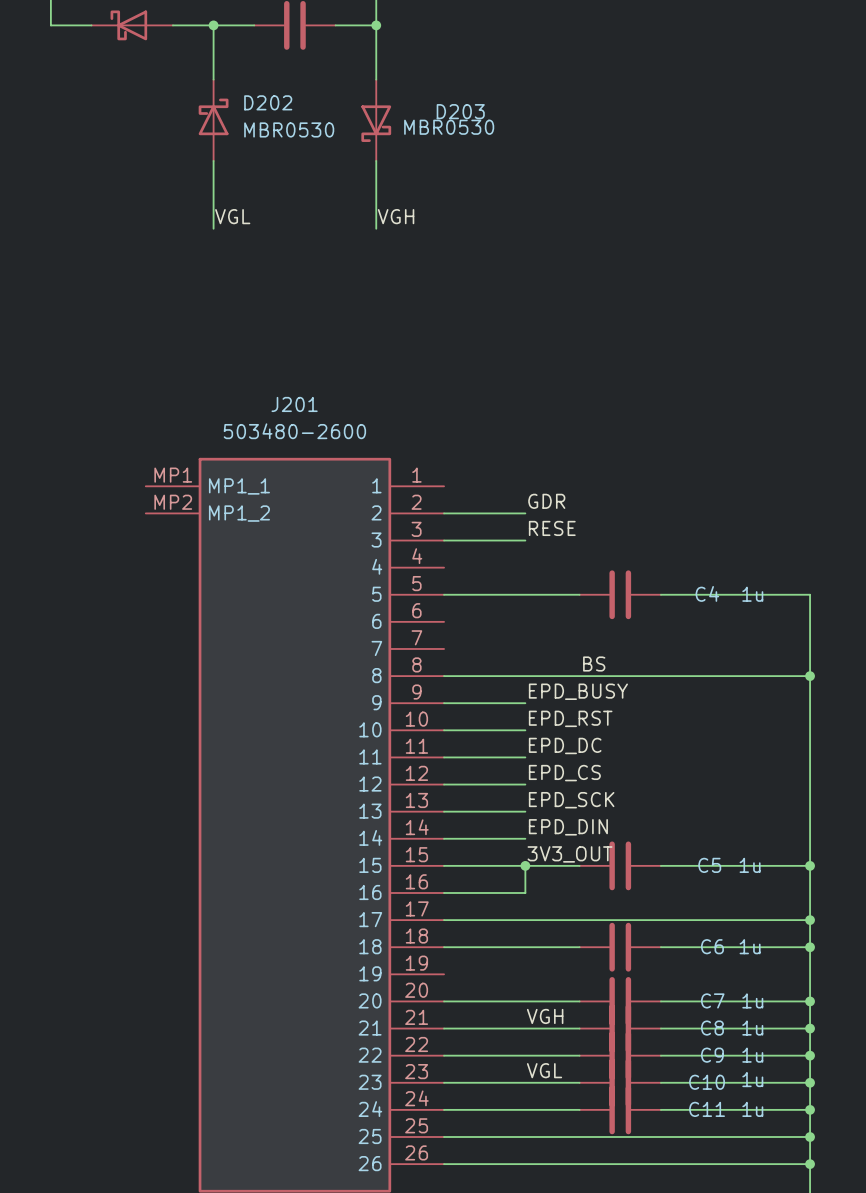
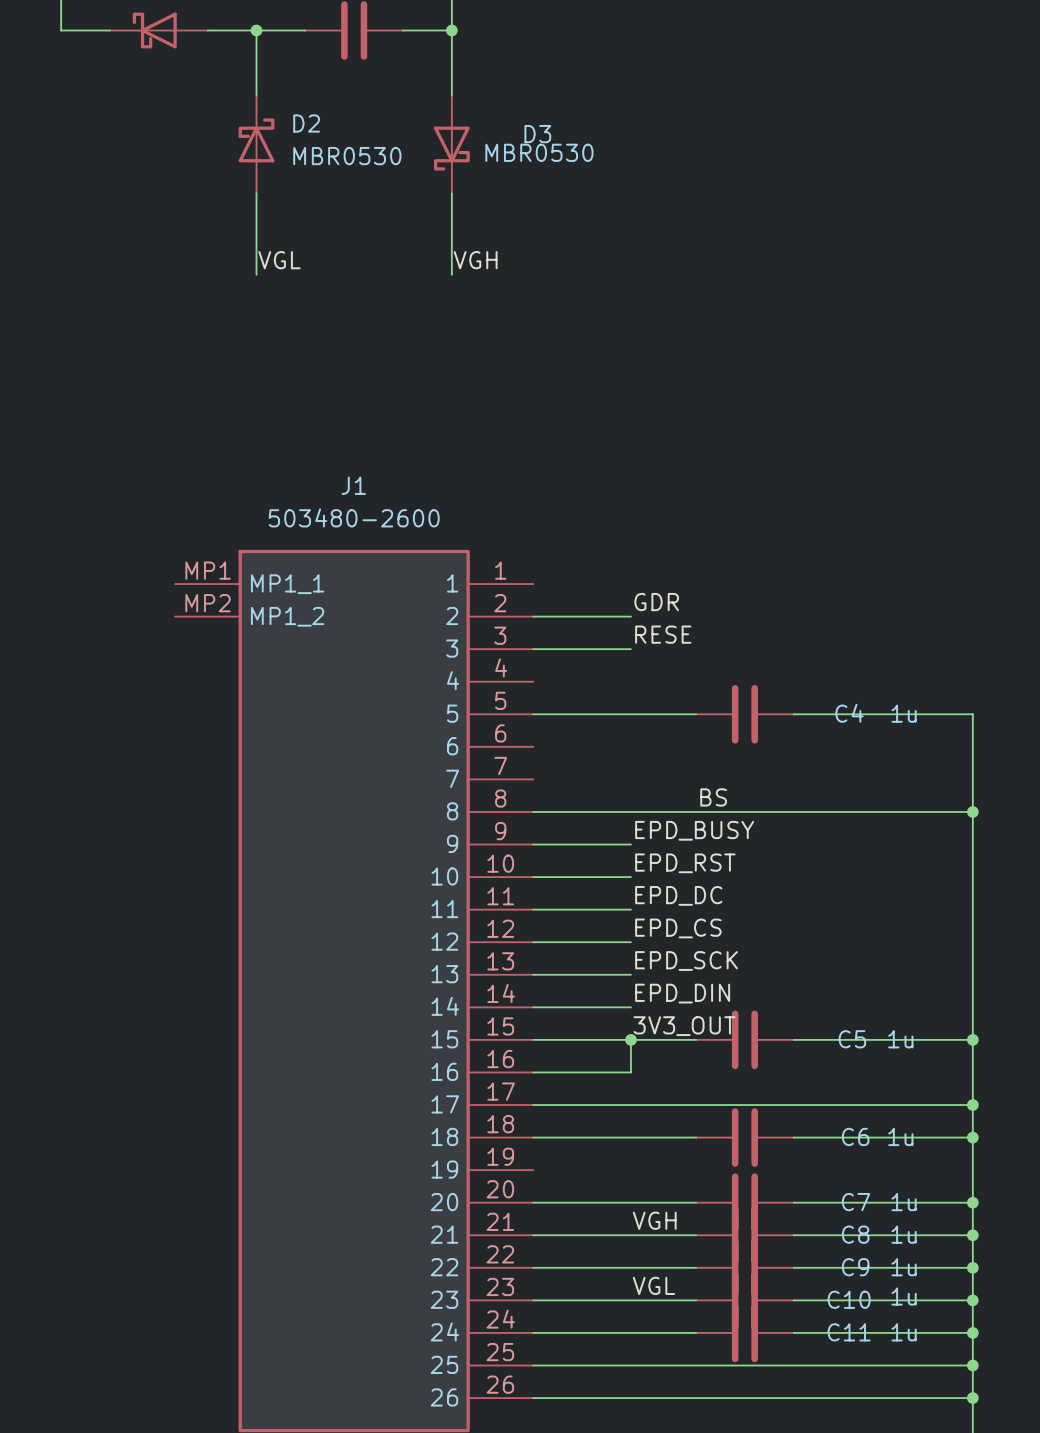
D202 name: D202 (268, 102) -> D2 (306, 123)
D203 name: D203 (460, 111) -> D3 (537, 134)
J201 name: J201 (294, 404) -> J1 (353, 485)

